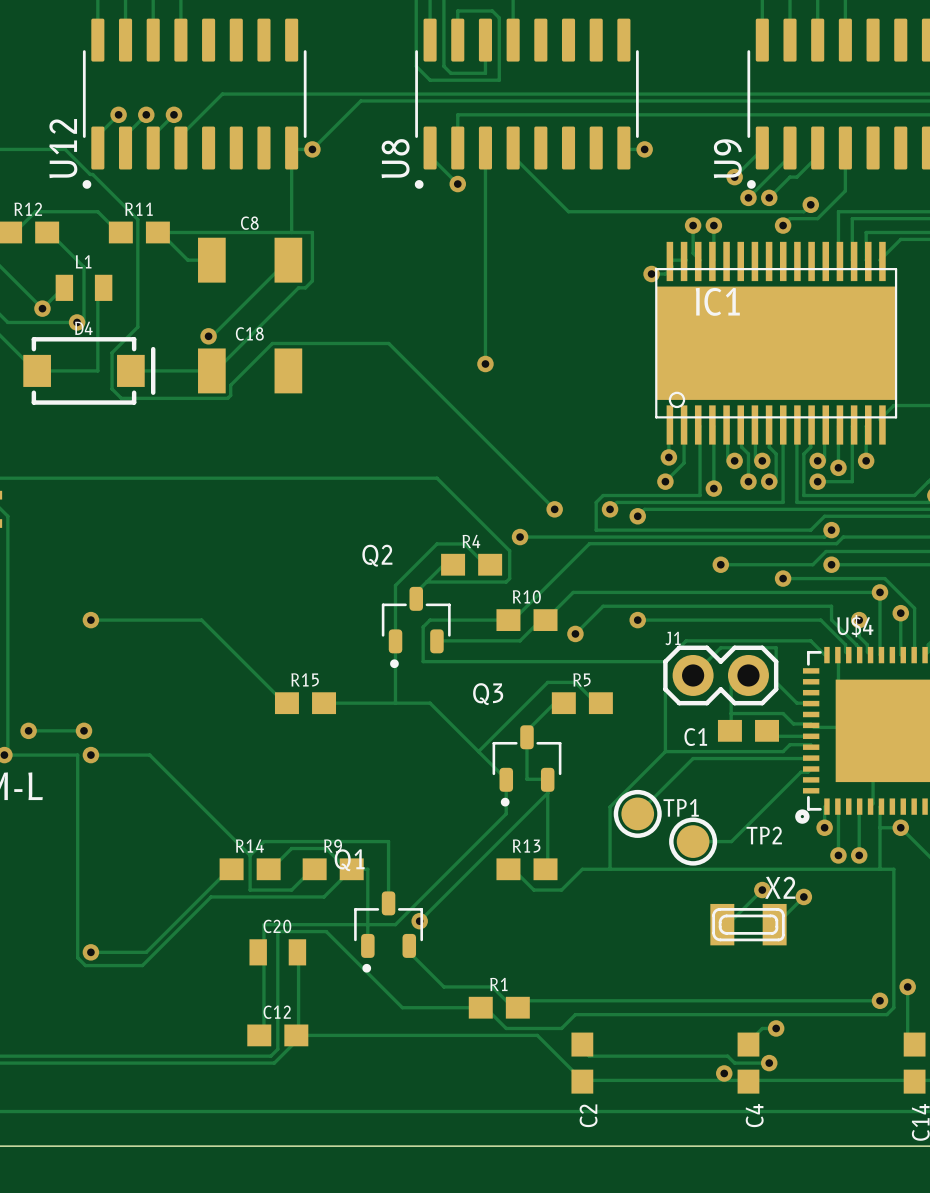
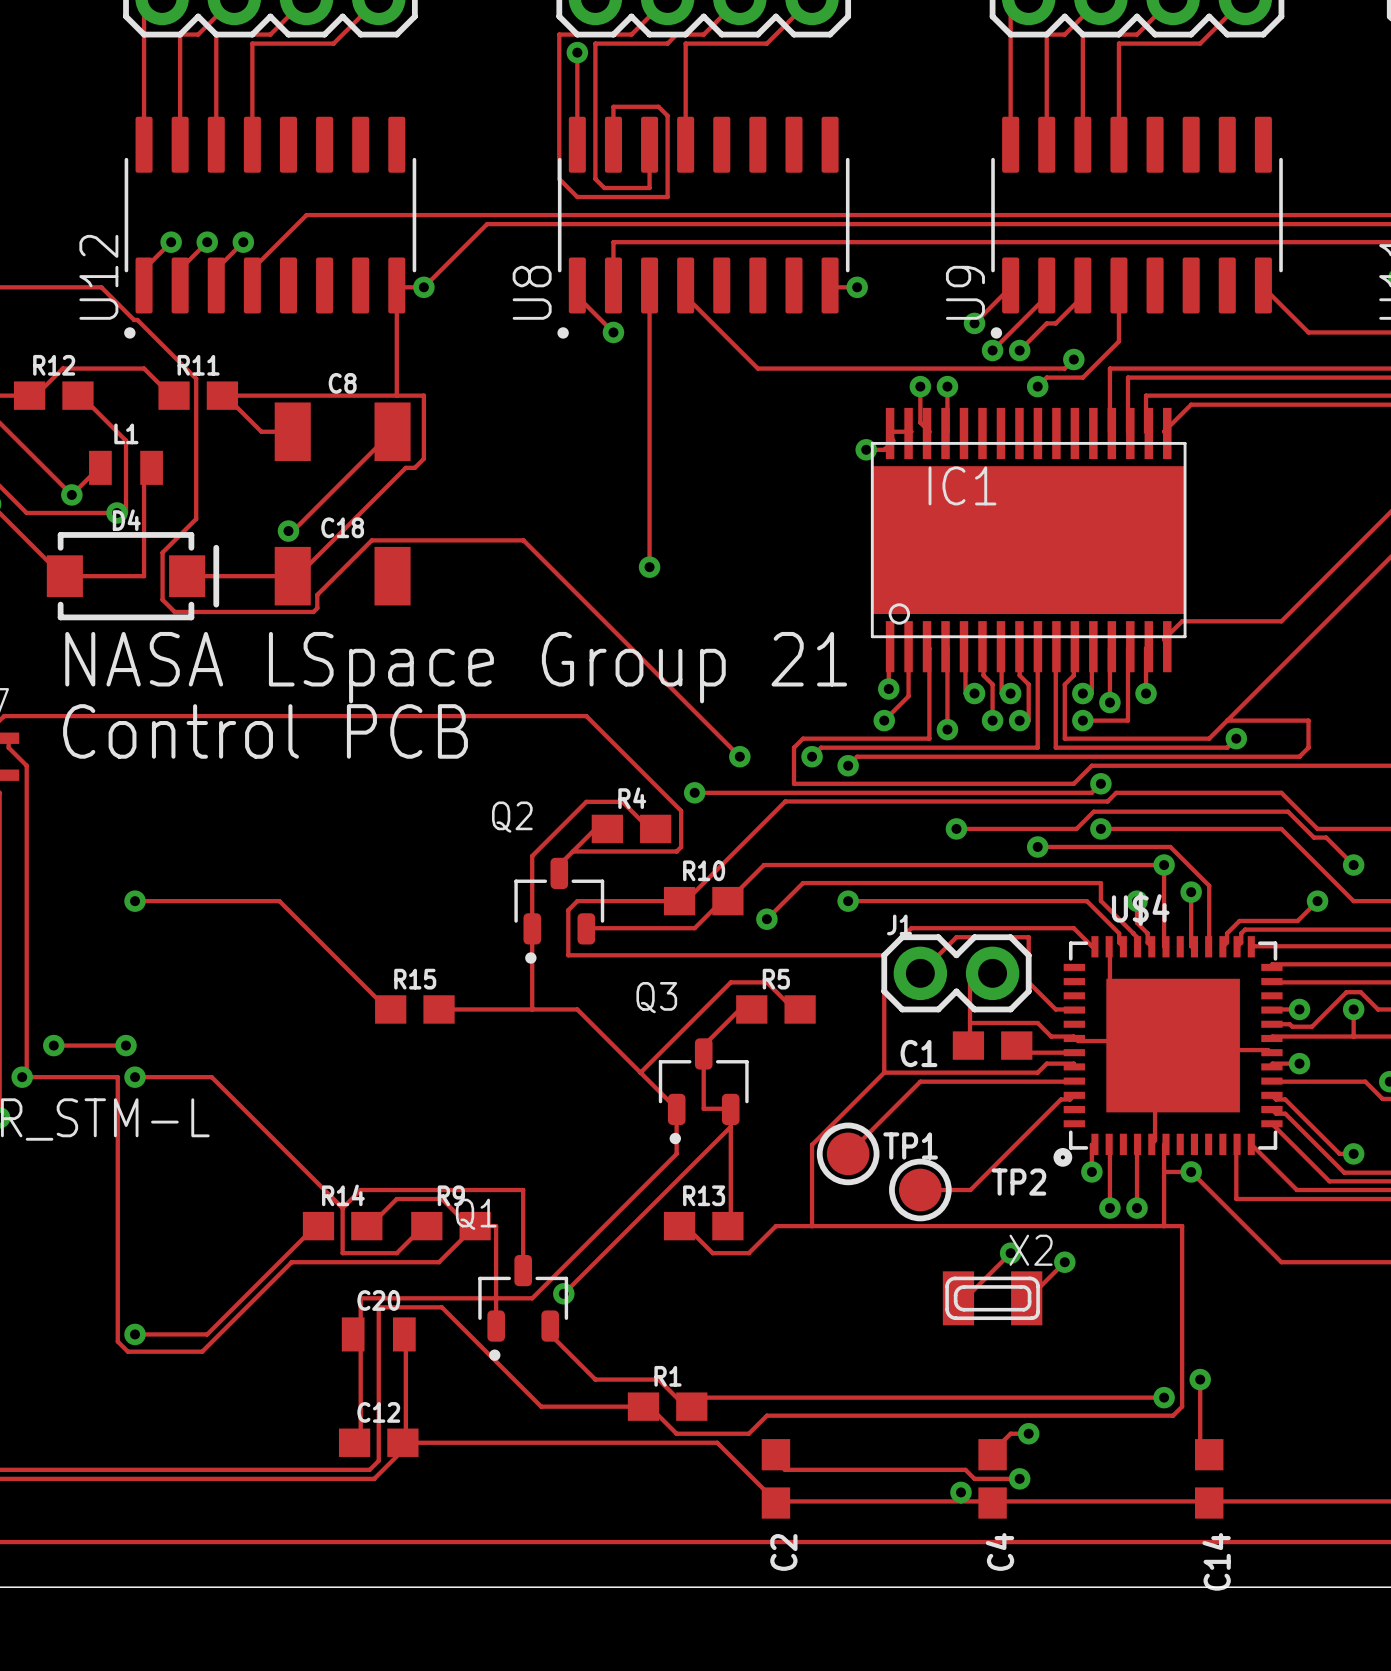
text: none -> NASA LSpace Group 21 (456, 667)
text: none -> Control PCB (265, 731)

